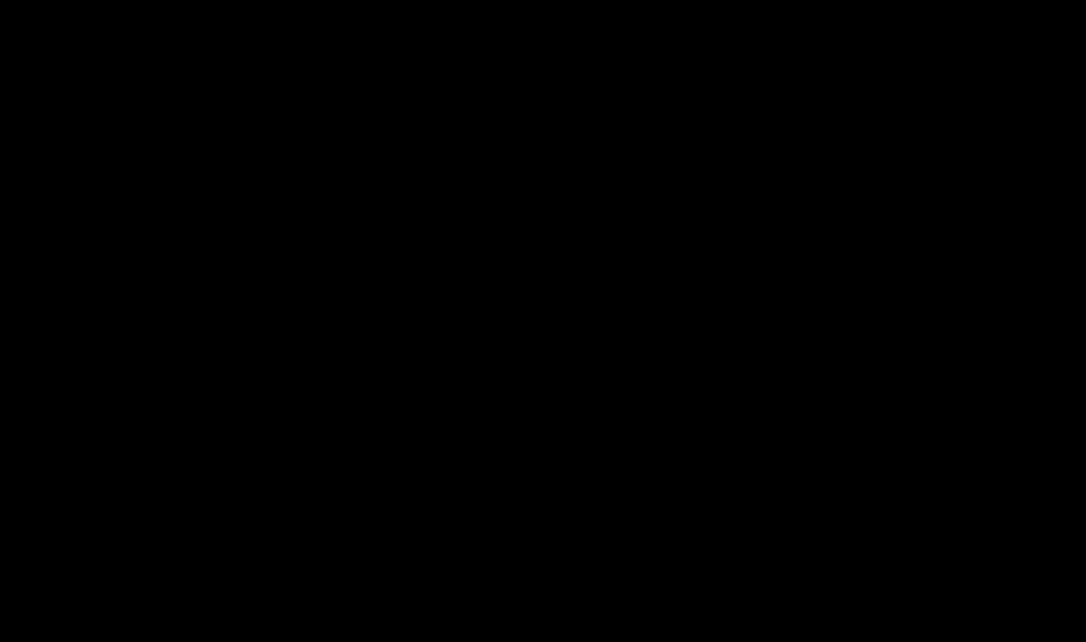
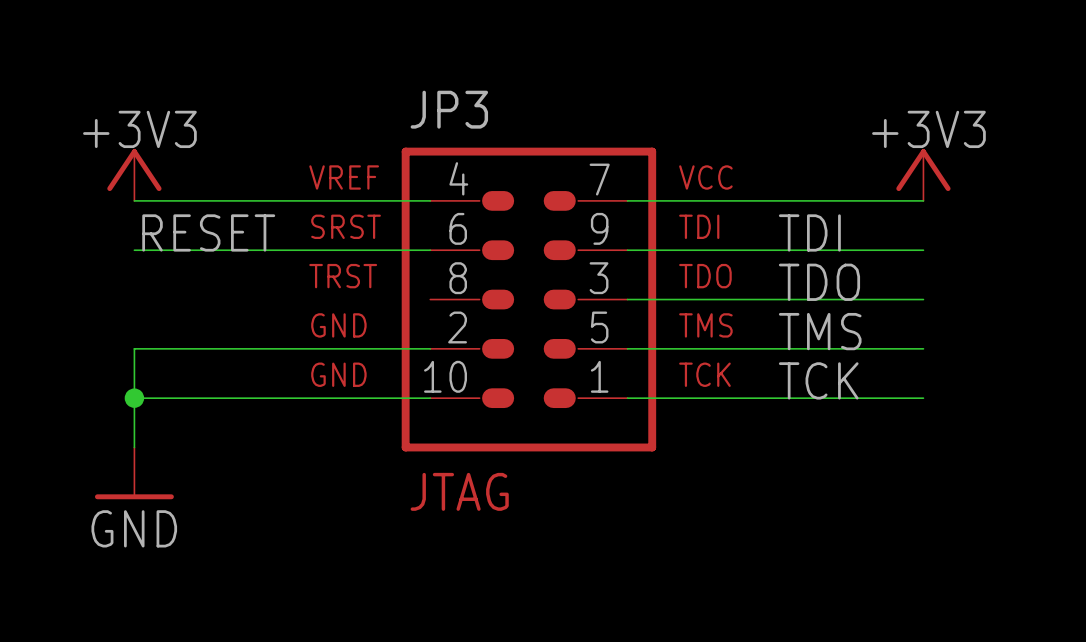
power symbol: none -> +3V3 (134, 175)
power symbol: none -> +3V3 (923, 175)
wire: none -> (134, 200) (430, 200)
wire: none -> (627, 200) (923, 200)
label: none -> RESET (208, 232)
label: none -> TDI (809, 232)
wire: none -> (134, 250) (430, 250)
wire: none -> (627, 250) (923, 250)
label: none -> TDO (819, 282)
JP3: none -> (528, 299)
wire: none -> (627, 299) (923, 299)
label: none -> TMS (820, 331)
wire: none -> (430, 348) (134, 348) (134, 447)
wire: none -> (627, 348) (923, 348)
label: none -> TCK (818, 380)
wire: none -> (134, 398) (430, 398)
junction: none -> (134, 398)
wire: none -> (627, 398) (923, 398)
power symbol: none -> GND (134, 473)

